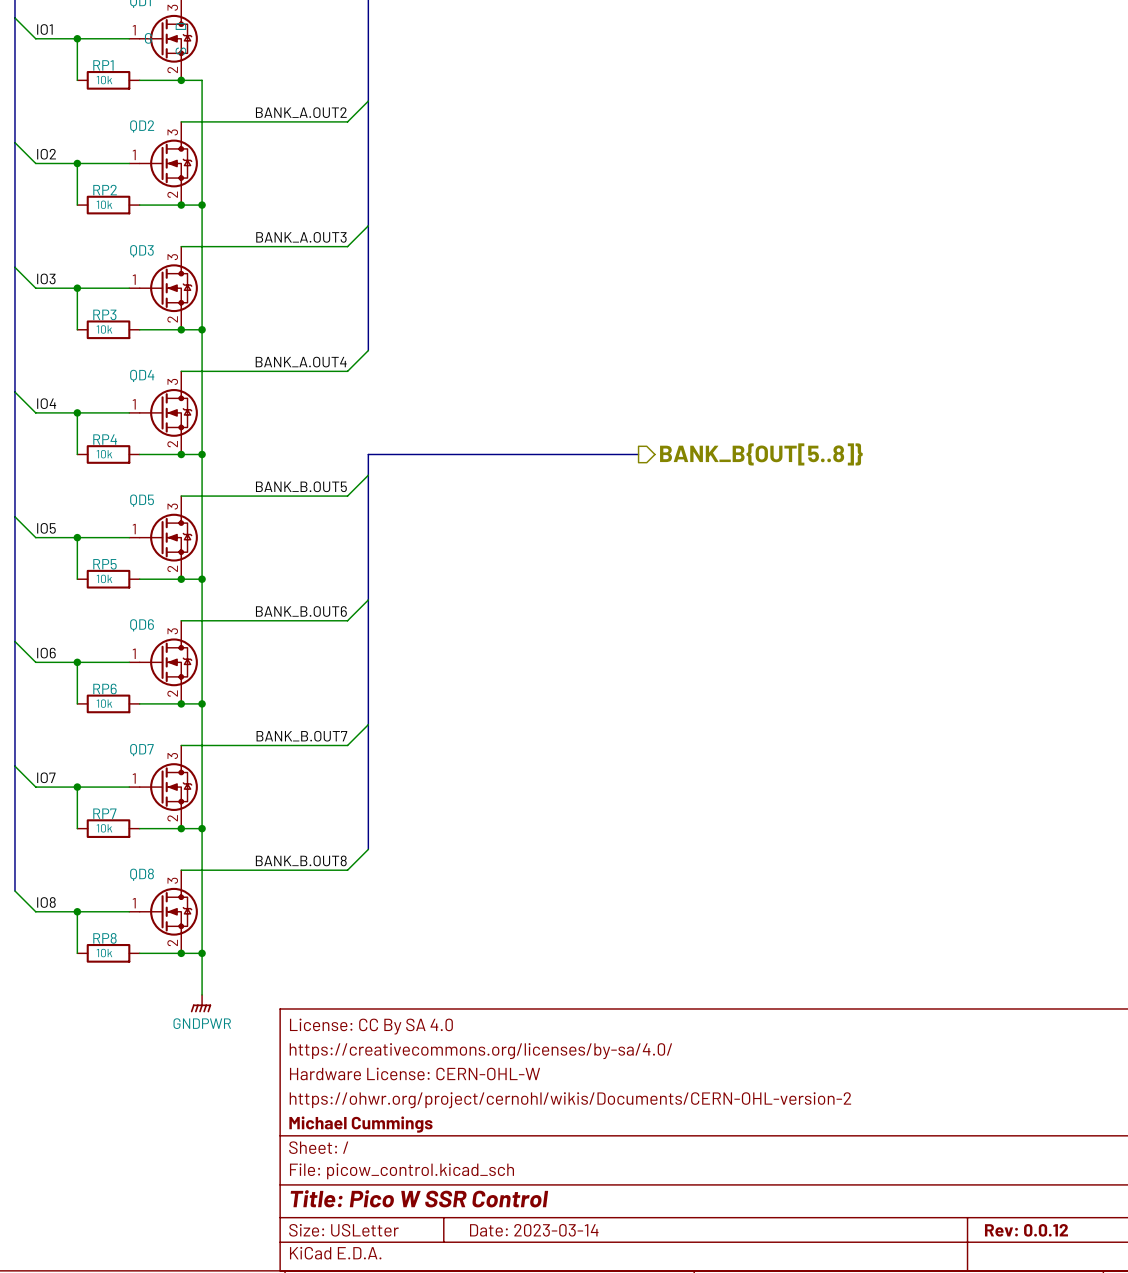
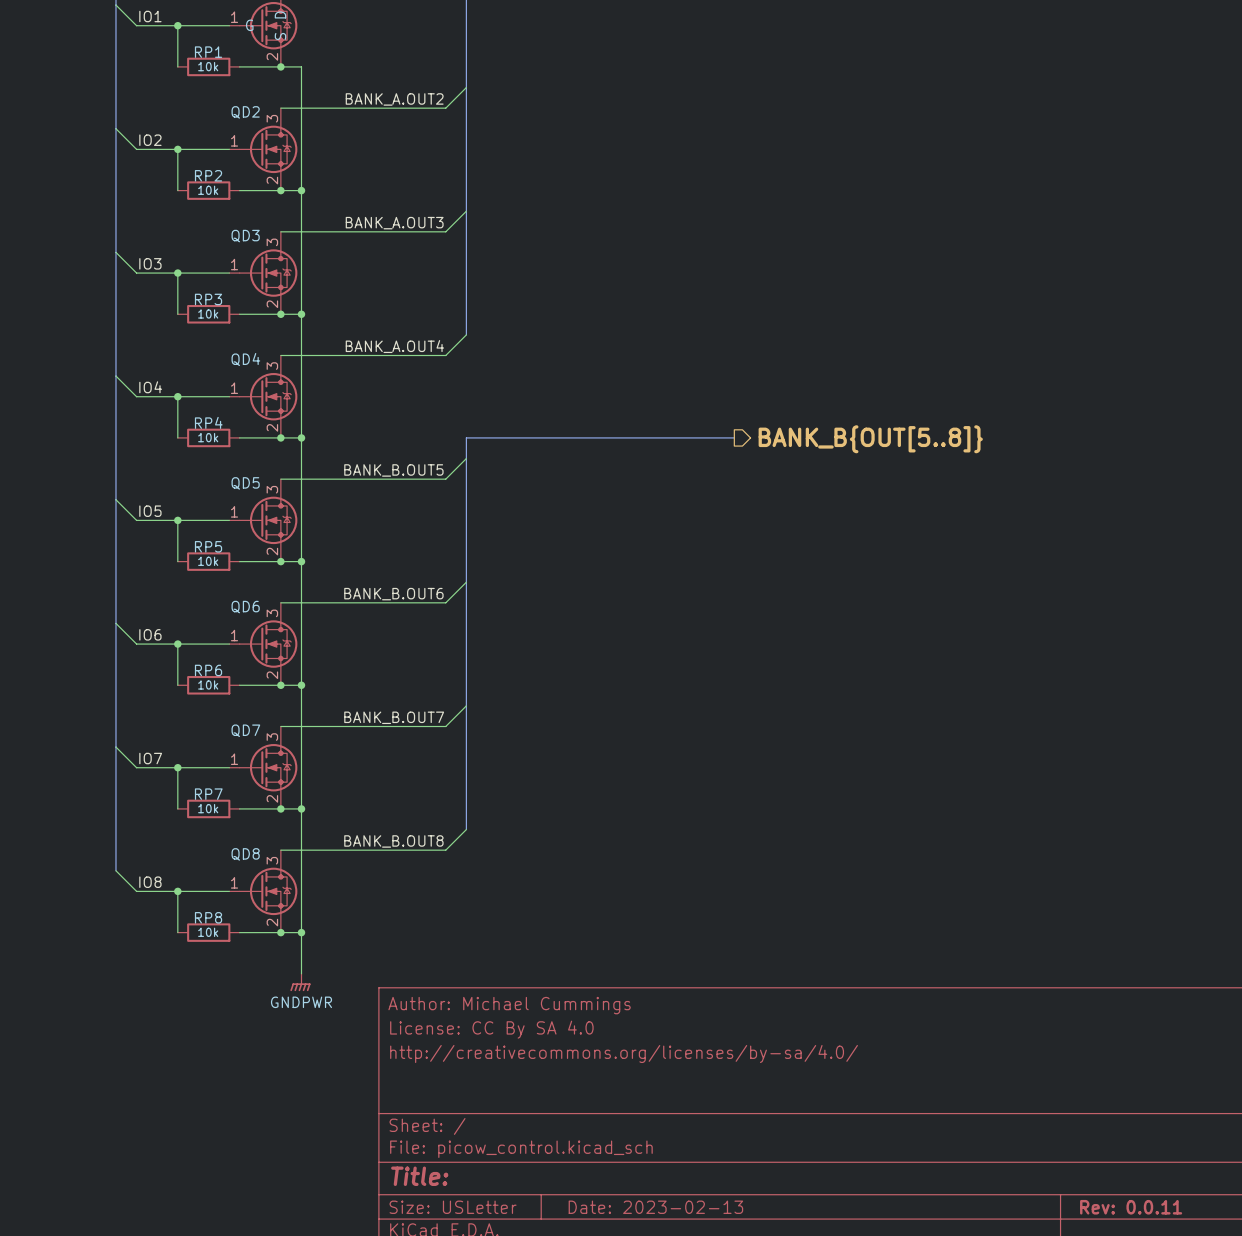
title block: License: CC By SA 4.0 (371, 1026) -> Author: Michael Cummings (509, 1005)
title block: https://creativecommons.org/licenses/by-sa/4.0/ (480, 1051) -> License: CC By SA 4.0 (491, 1029)
title block: Hardware License: CERN-OHL-W (415, 1073) -> http://creativecommons.org/licenses/by-sa/4.0/ (624, 1054)
title block: https://ohwr.org/project/cernohl/wikis/Documents/CERN-OHL-version-2 (570, 1100) -> none
title block: Michael Cummings (360, 1124) -> none
title block: Title: Pico W SSR Control (419, 1198) -> Title: (419, 1176)
title block: Date: 2023-03-14 (534, 1230) -> Date: 2023-02-13 (655, 1207)
title block: Rev: 0.0.12 (1026, 1230) -> Rev: 0.0.11 (1131, 1207)

